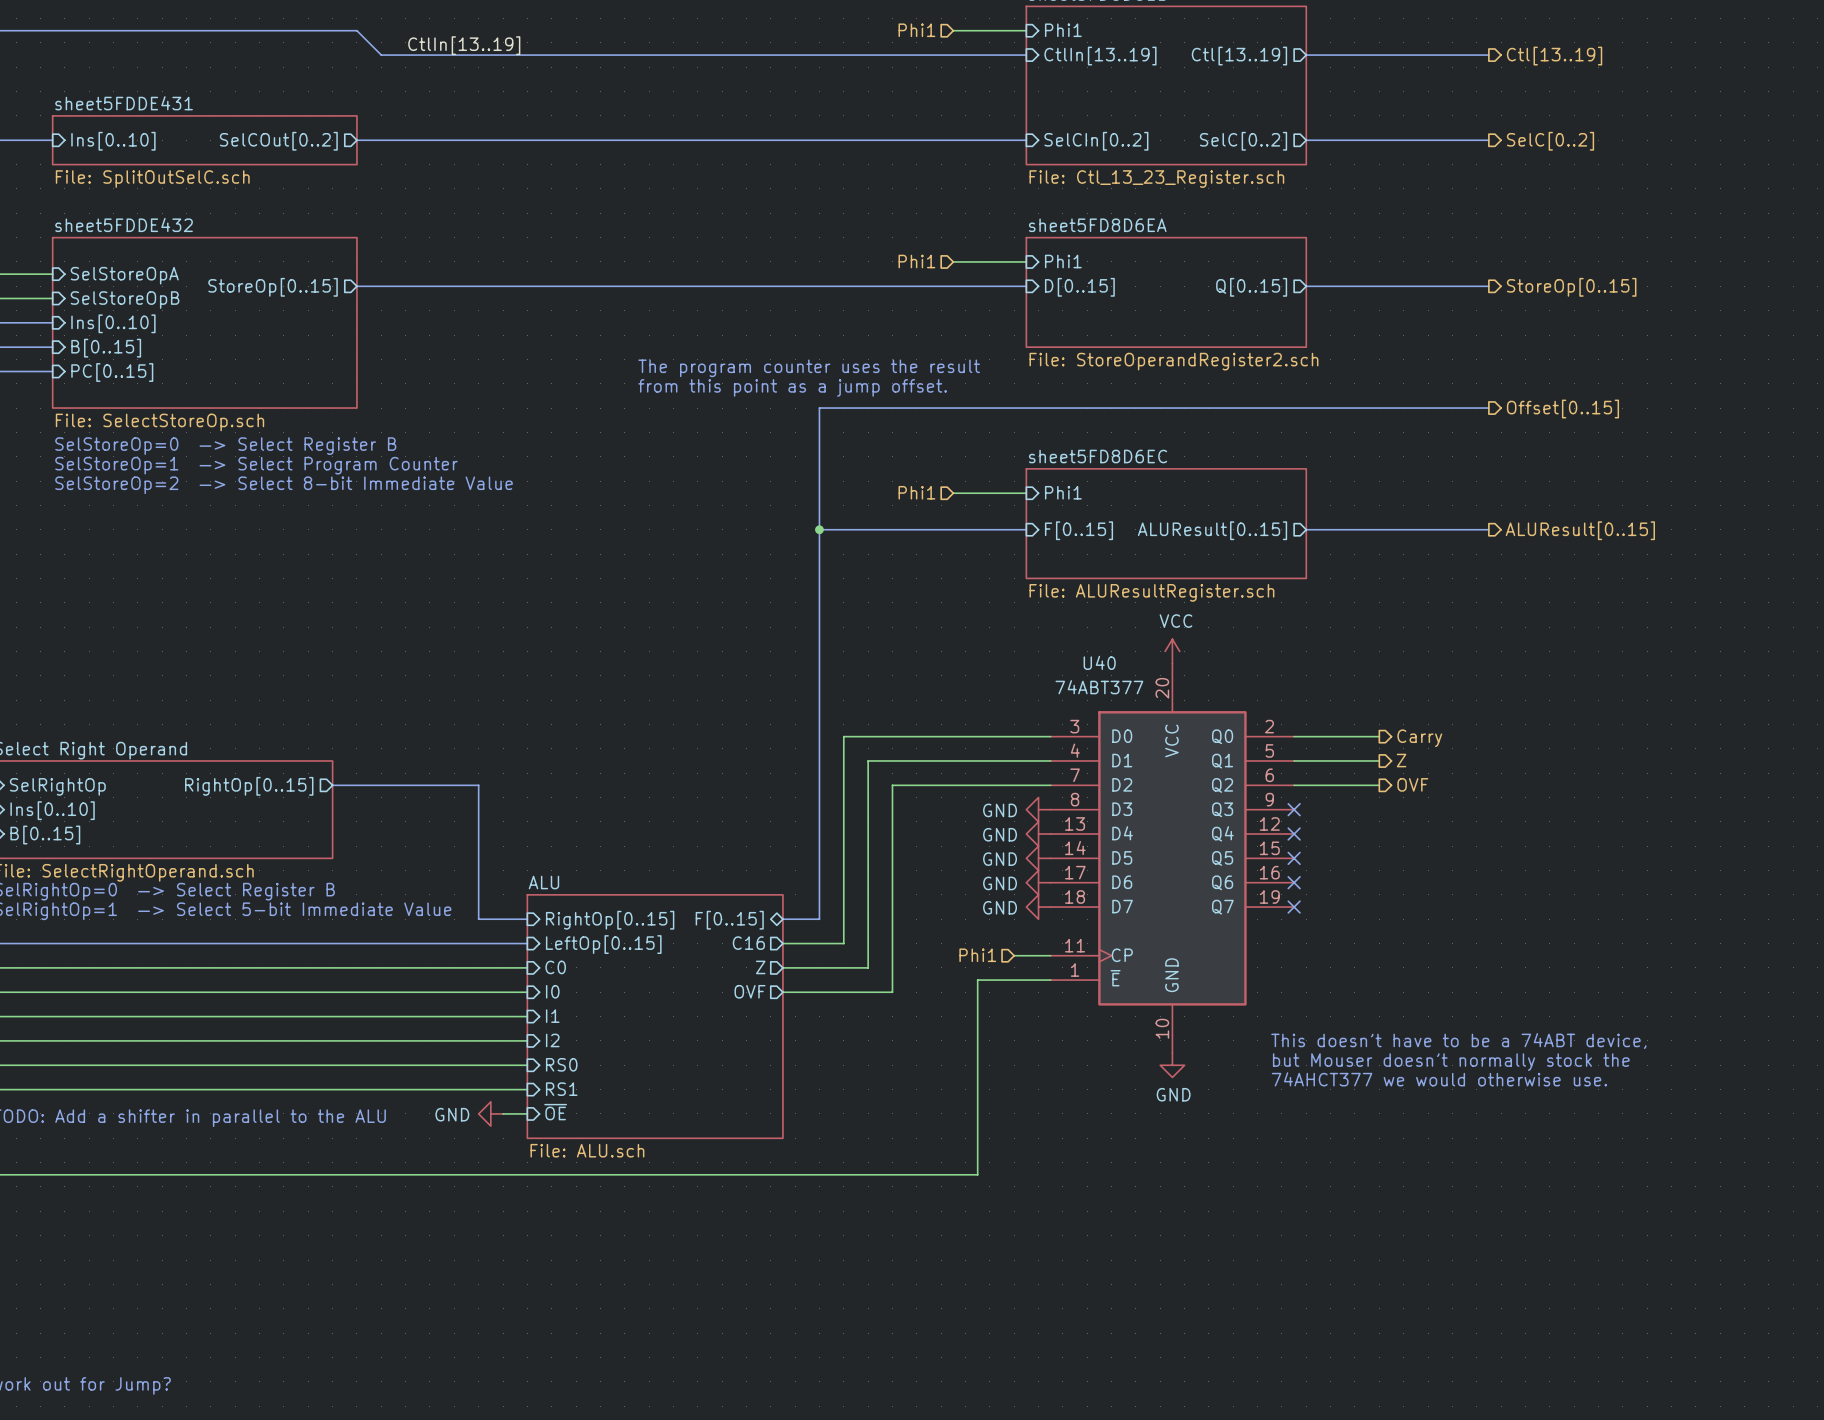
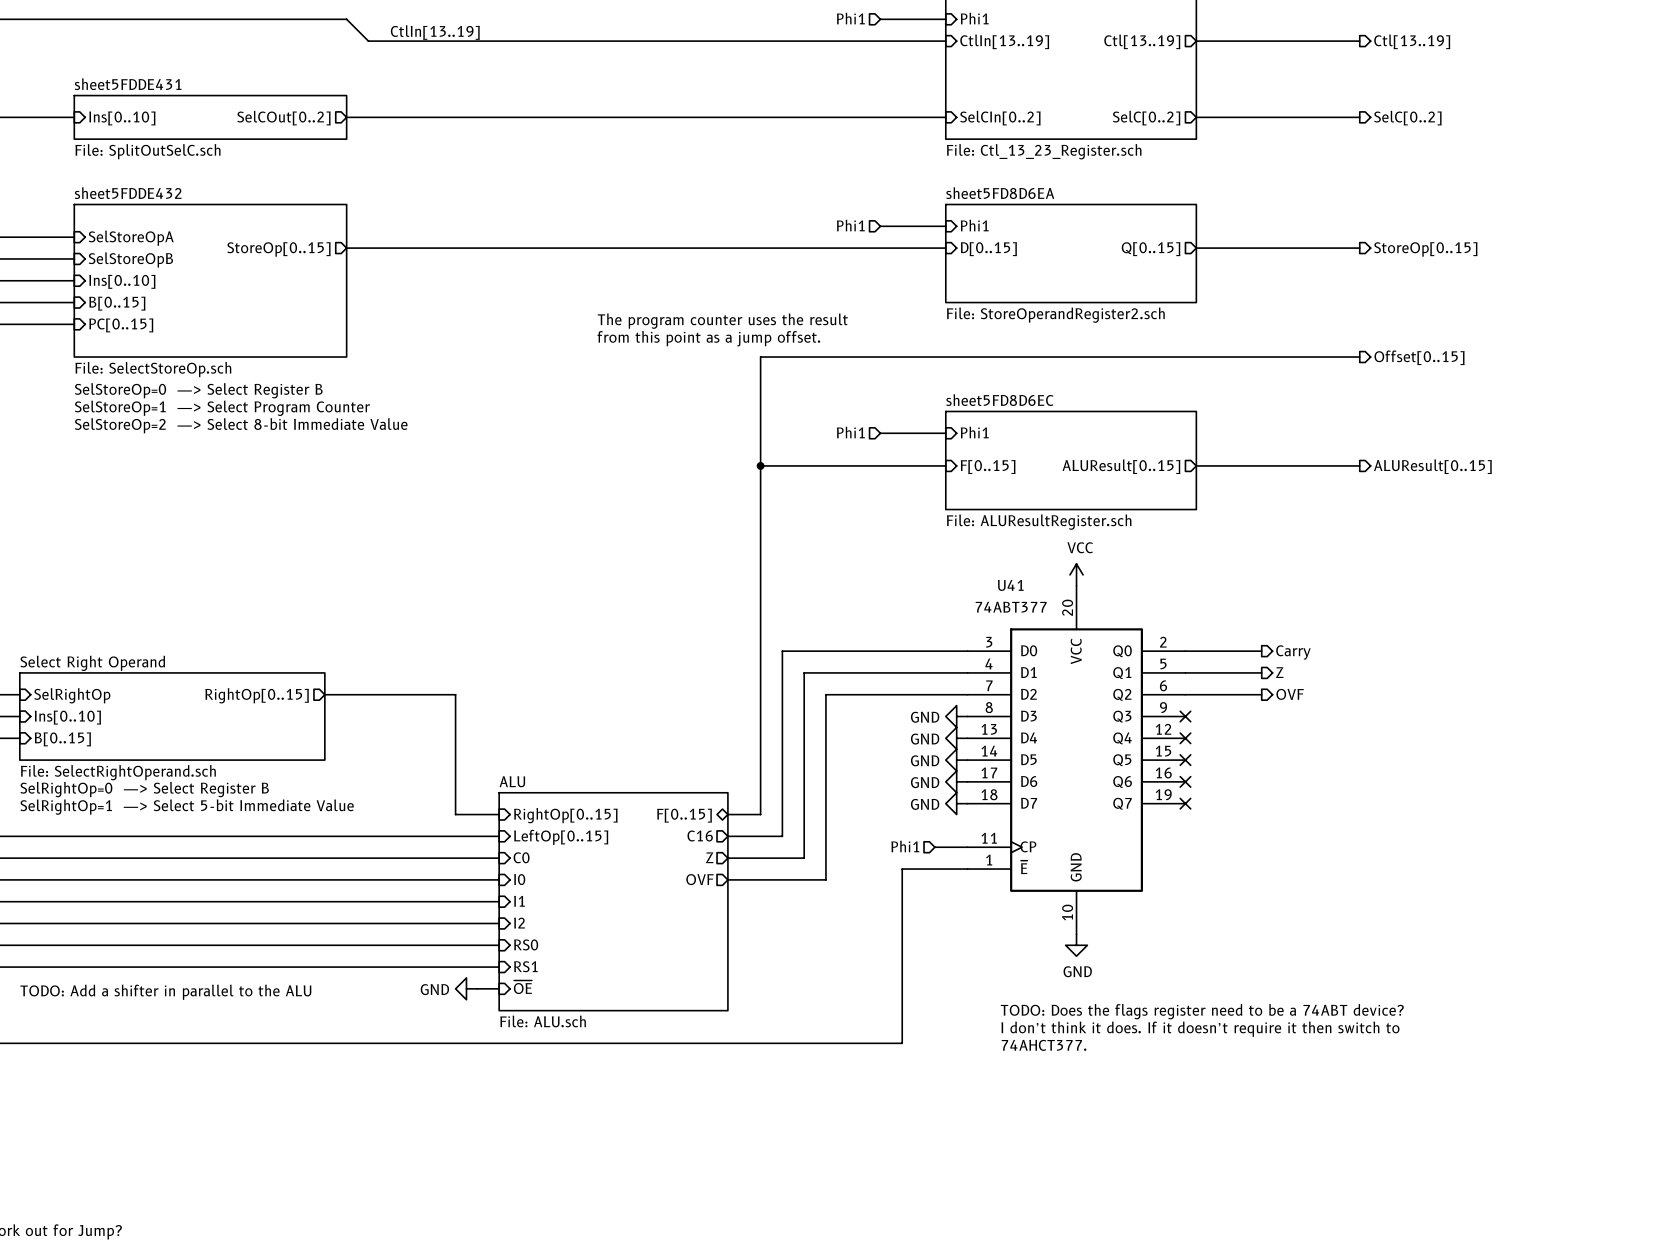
U40 name: U40 (1099, 662) -> U41 (1010, 585)
text: This doesn’t have to be a 74ABT device, (1458, 1041) -> none
text: but Mouser doesn’t normally stock the (1451, 1062) -> none
text: 74AHCT377 we would otherwise use. (1439, 1079) -> none
text: none -> TODO: Does the flags register need to be a 74ABT device? (1202, 1011)
text: none -> I don’t think it does. If it doesn’t require it then switch to (1200, 1029)
text: none -> 74AHCT377. (1044, 1045)

